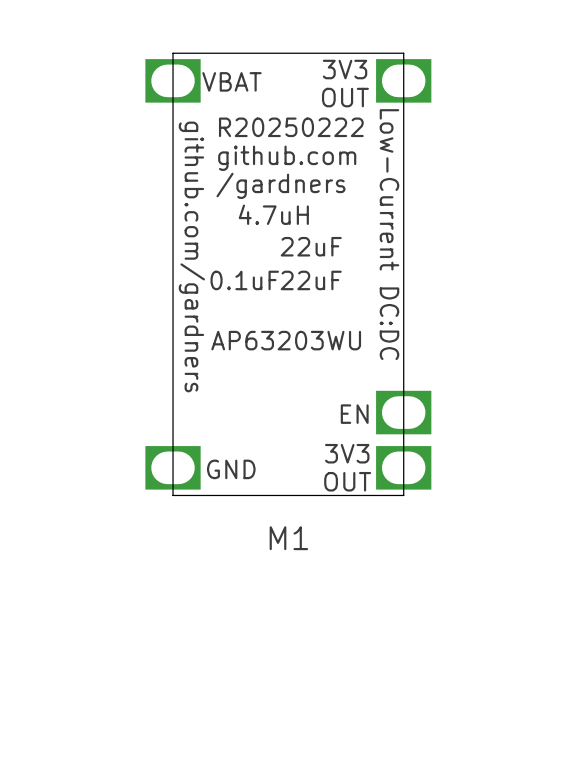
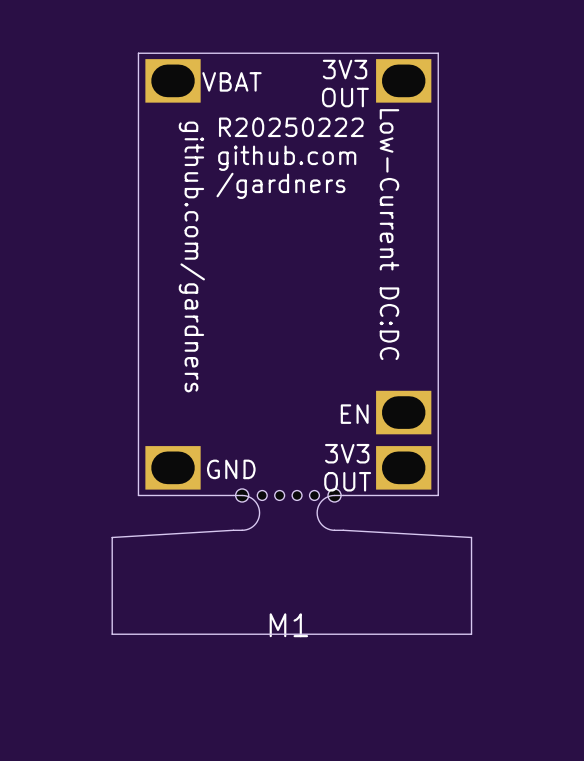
M1 footprint: [145, 52, 432, 497] -> [137, 52, 439, 531]
part: 4.7uH (273, 214) -> none
part: 22uF (311, 246) -> none
part: 0.1uF (244, 280) -> none
part: 22uF (311, 280) -> none
part: AP63203WU (286, 340) -> none
board edge: none -> (343, 530) (471, 537) (471, 634) (112, 634) (112, 537) (233, 530)
M1 name position: M1 (288, 538) -> M1 (288, 625)

